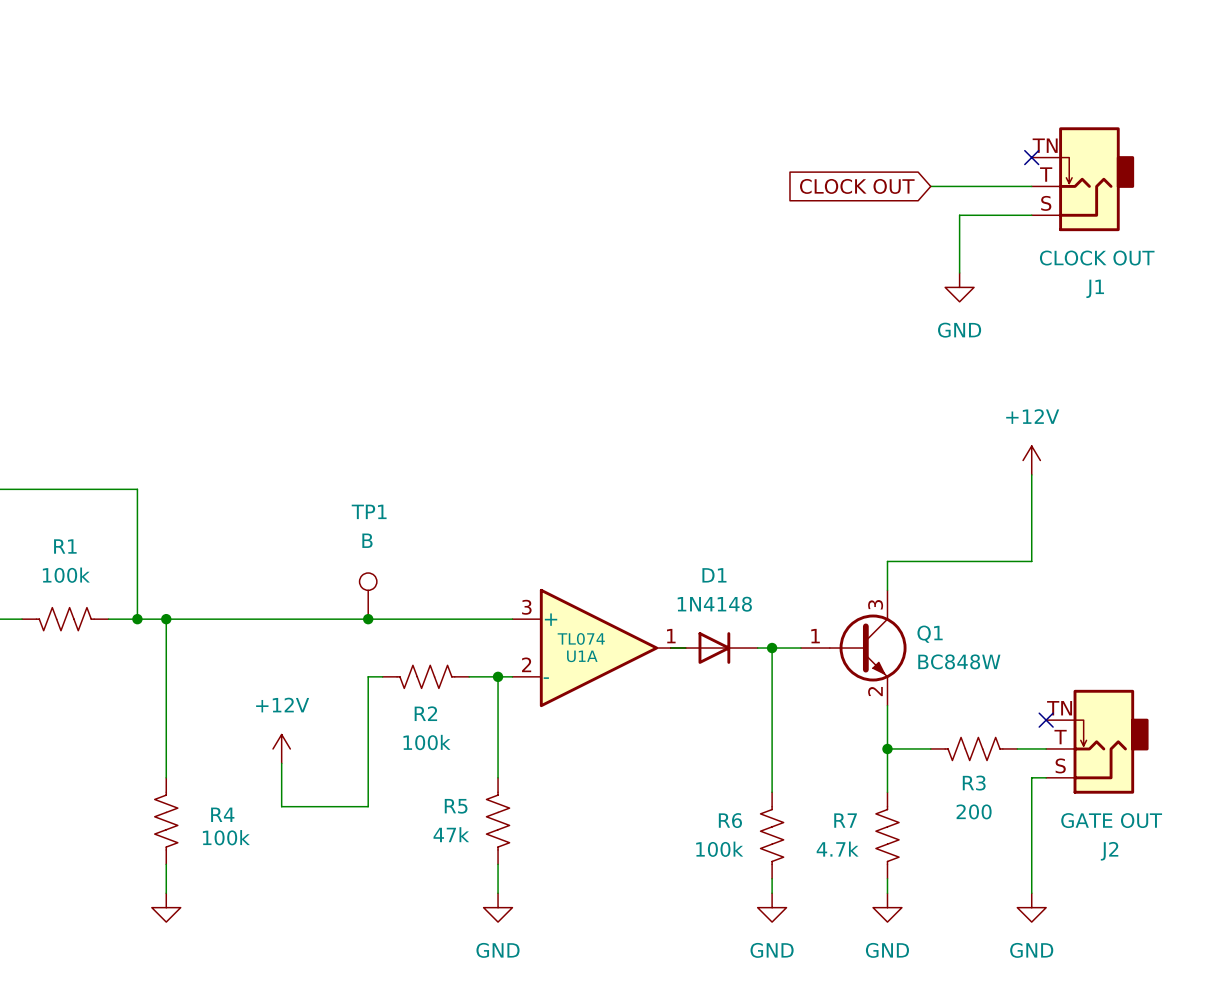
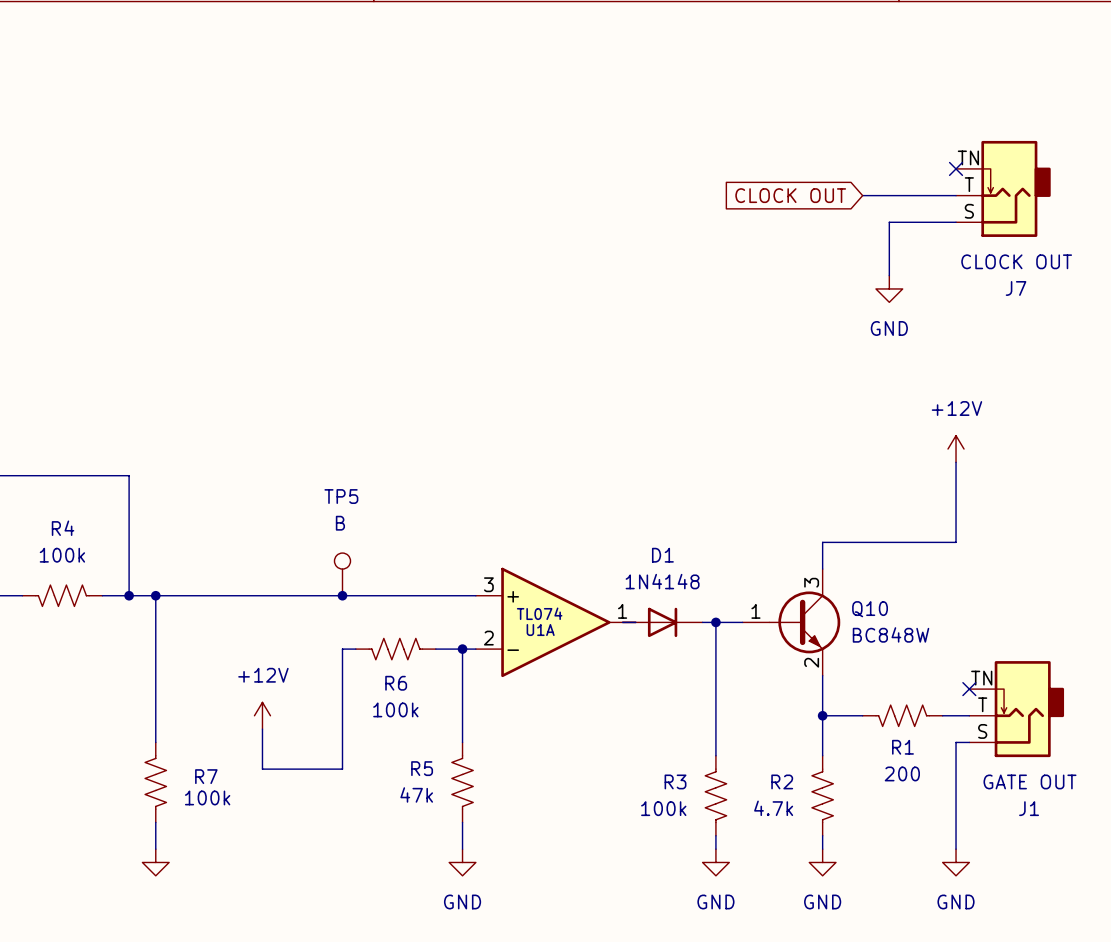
J1 name: J1 (1095, 288) -> J7 (1016, 288)
TP1 name: TP1 (369, 511) -> TP5 (341, 496)
R1 name: R1 (65, 546) -> R4 (63, 528)
Q1 name: Q1 (930, 634) -> Q10 (870, 609)
R2 name: R2 (425, 713) -> R6 (396, 683)
R3 name: R3 (974, 783) -> R1 (902, 747)
R4 name: R4 (222, 814) -> R7 (206, 776)
R6 name: R6 (730, 820) -> R3 (675, 781)
R7 name: R7 (845, 820) -> R2 (782, 781)
J2 name: J2 (1109, 851) -> J1 (1029, 808)

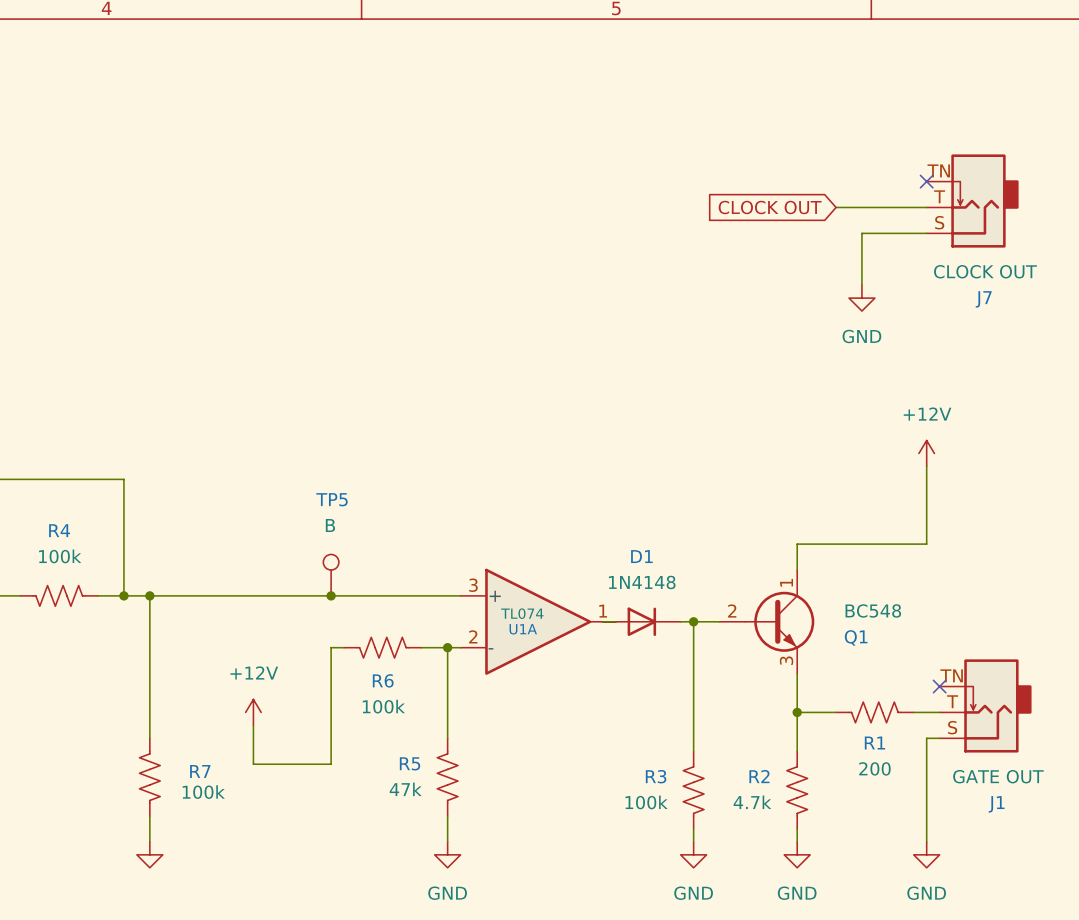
Q10 pin number: 3 (811, 582) -> 1 (786, 582)
Q10 name: Q10 (870, 609) -> Q1 (856, 637)
Q10 pin number: 1 (755, 611) -> 2 (732, 611)
Q10 value: BC848W (891, 634) -> BC548 (873, 610)
Q10 pin number: 2 (811, 662) -> 3 (786, 660)

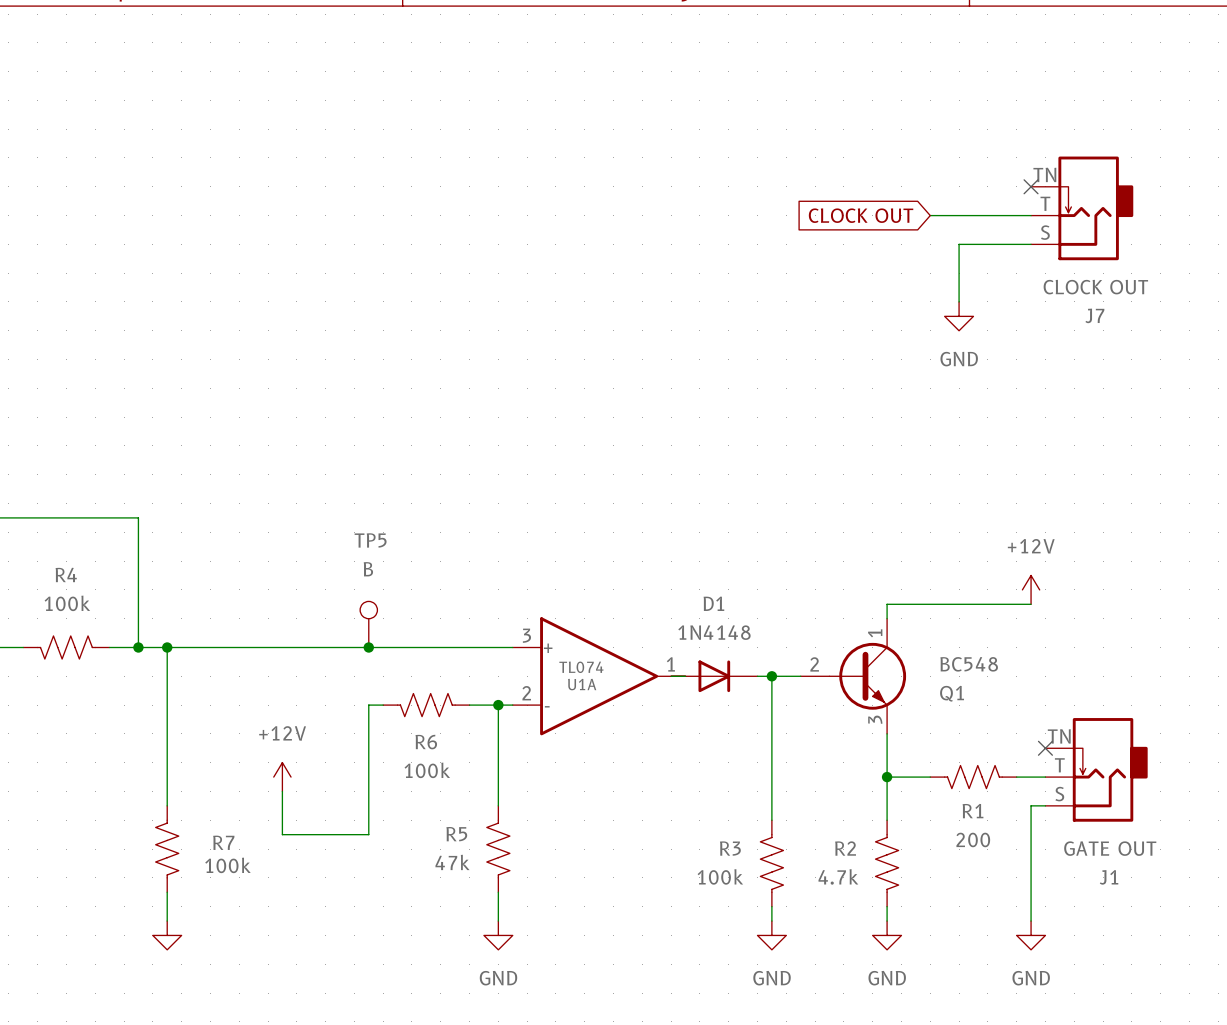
power symbol position: +12V (926, 453) -> +12V (1031, 589)
wire: (926, 466) (926, 544) (797, 544) (797, 557) -> (1031, 604) (887, 604)

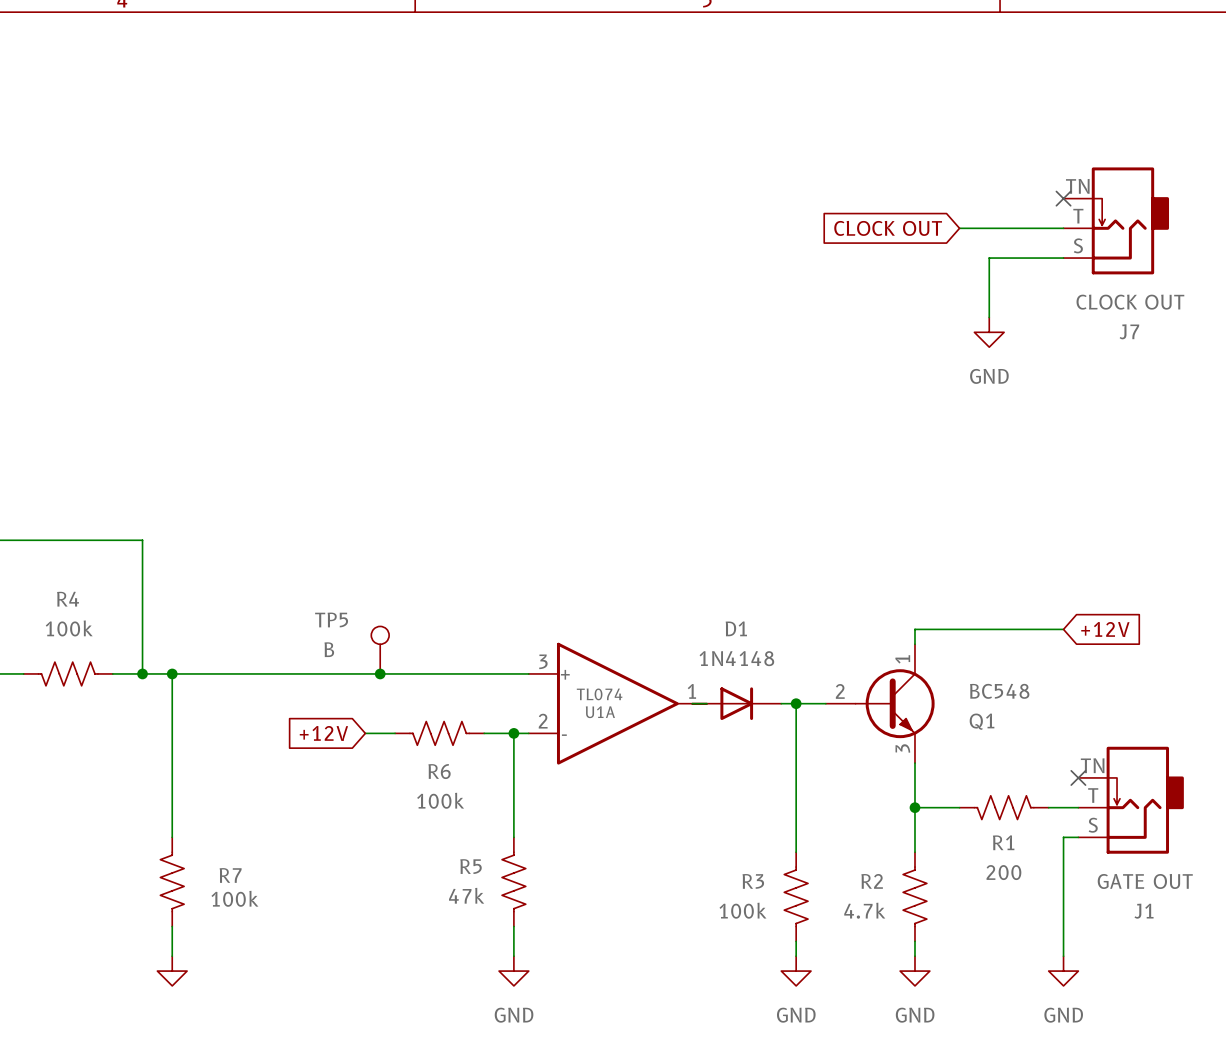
TP5 name position: TP5 (370, 540) -> TP5 (331, 619)
TP5 value position: B (368, 569) -> B (329, 649)
power symbol: +12V (1031, 589) -> none
global label: none -> +12V (1105, 629)
global label: none -> +12V (323, 733)
wire: (368, 705) (368, 834) (282, 834) (282, 791) -> (380, 733) (365, 733)
power symbol: +12V (282, 777) -> none

